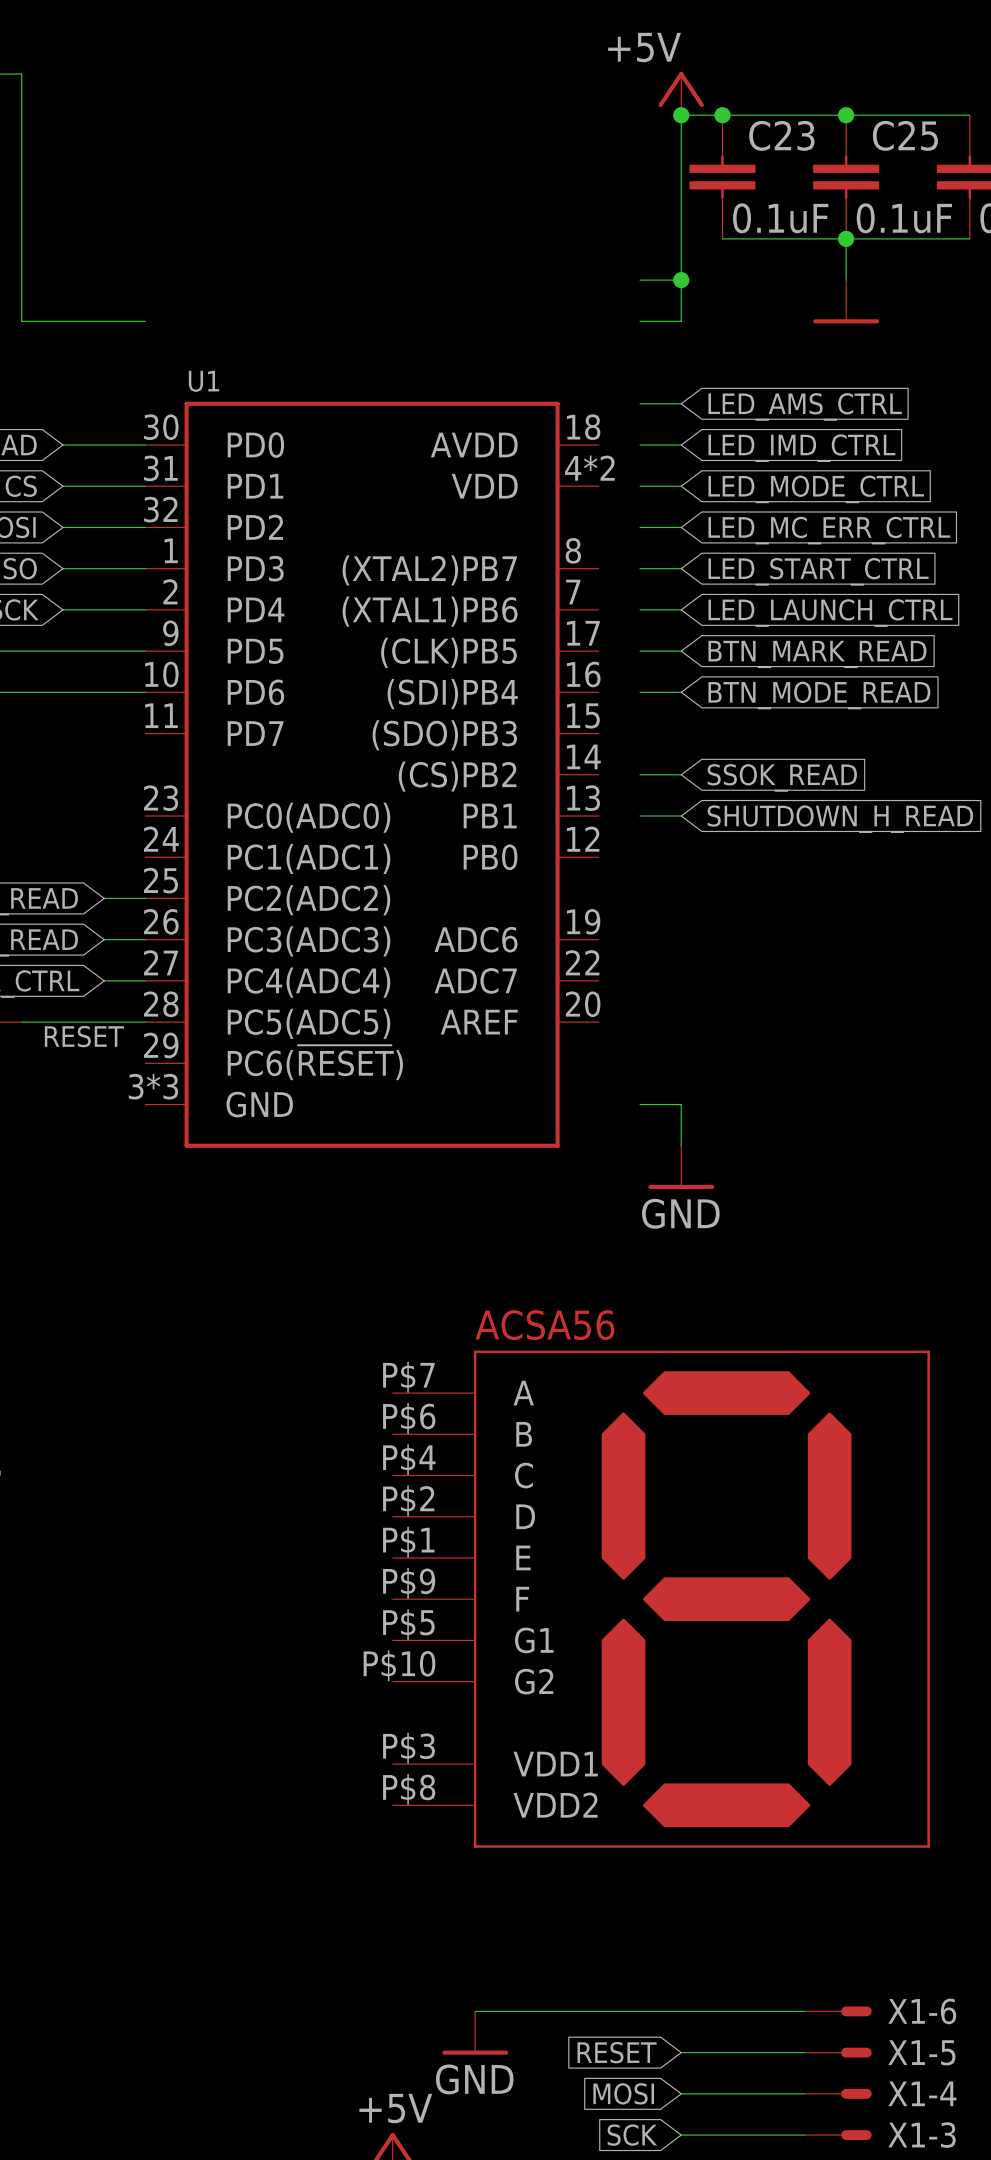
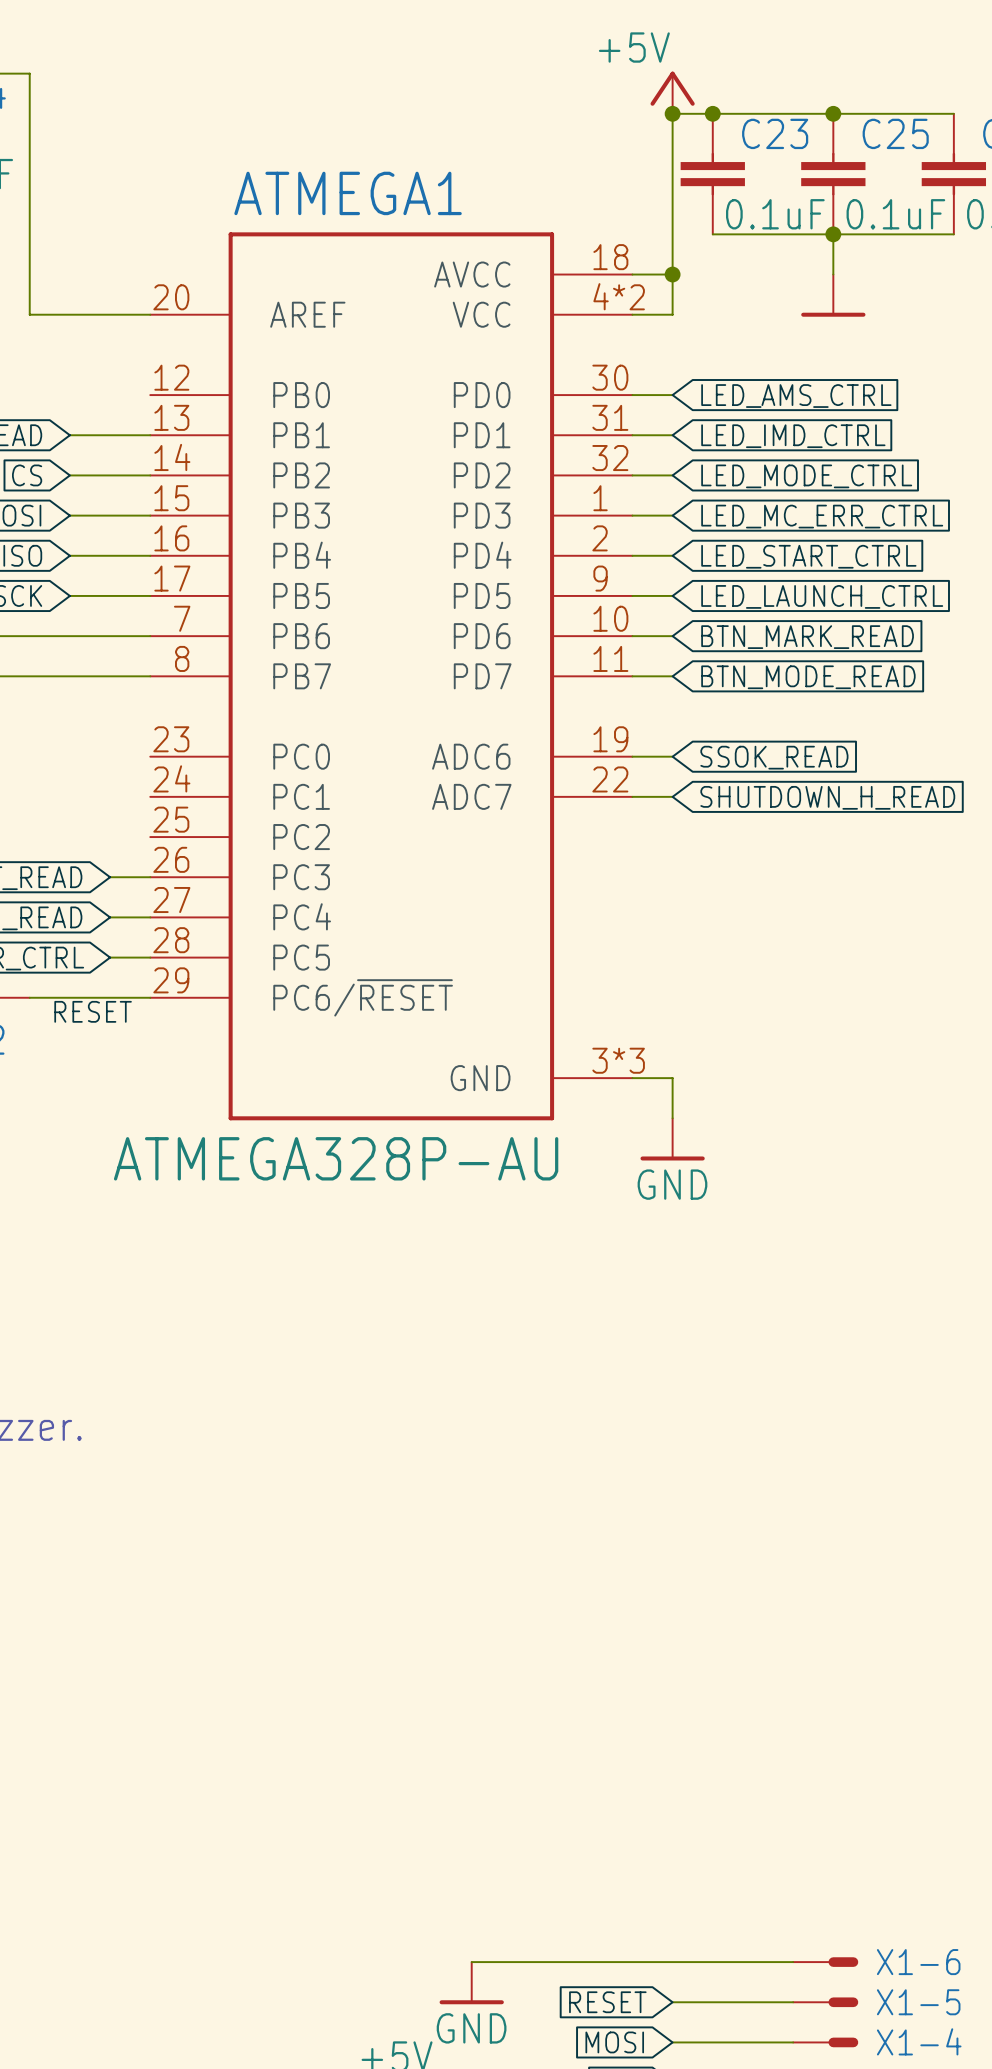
ATMEGA1: none -> ATMEGA328P-AU (391, 676)
U1: (372, 774) -> none
part: (661, 1599) -> none

